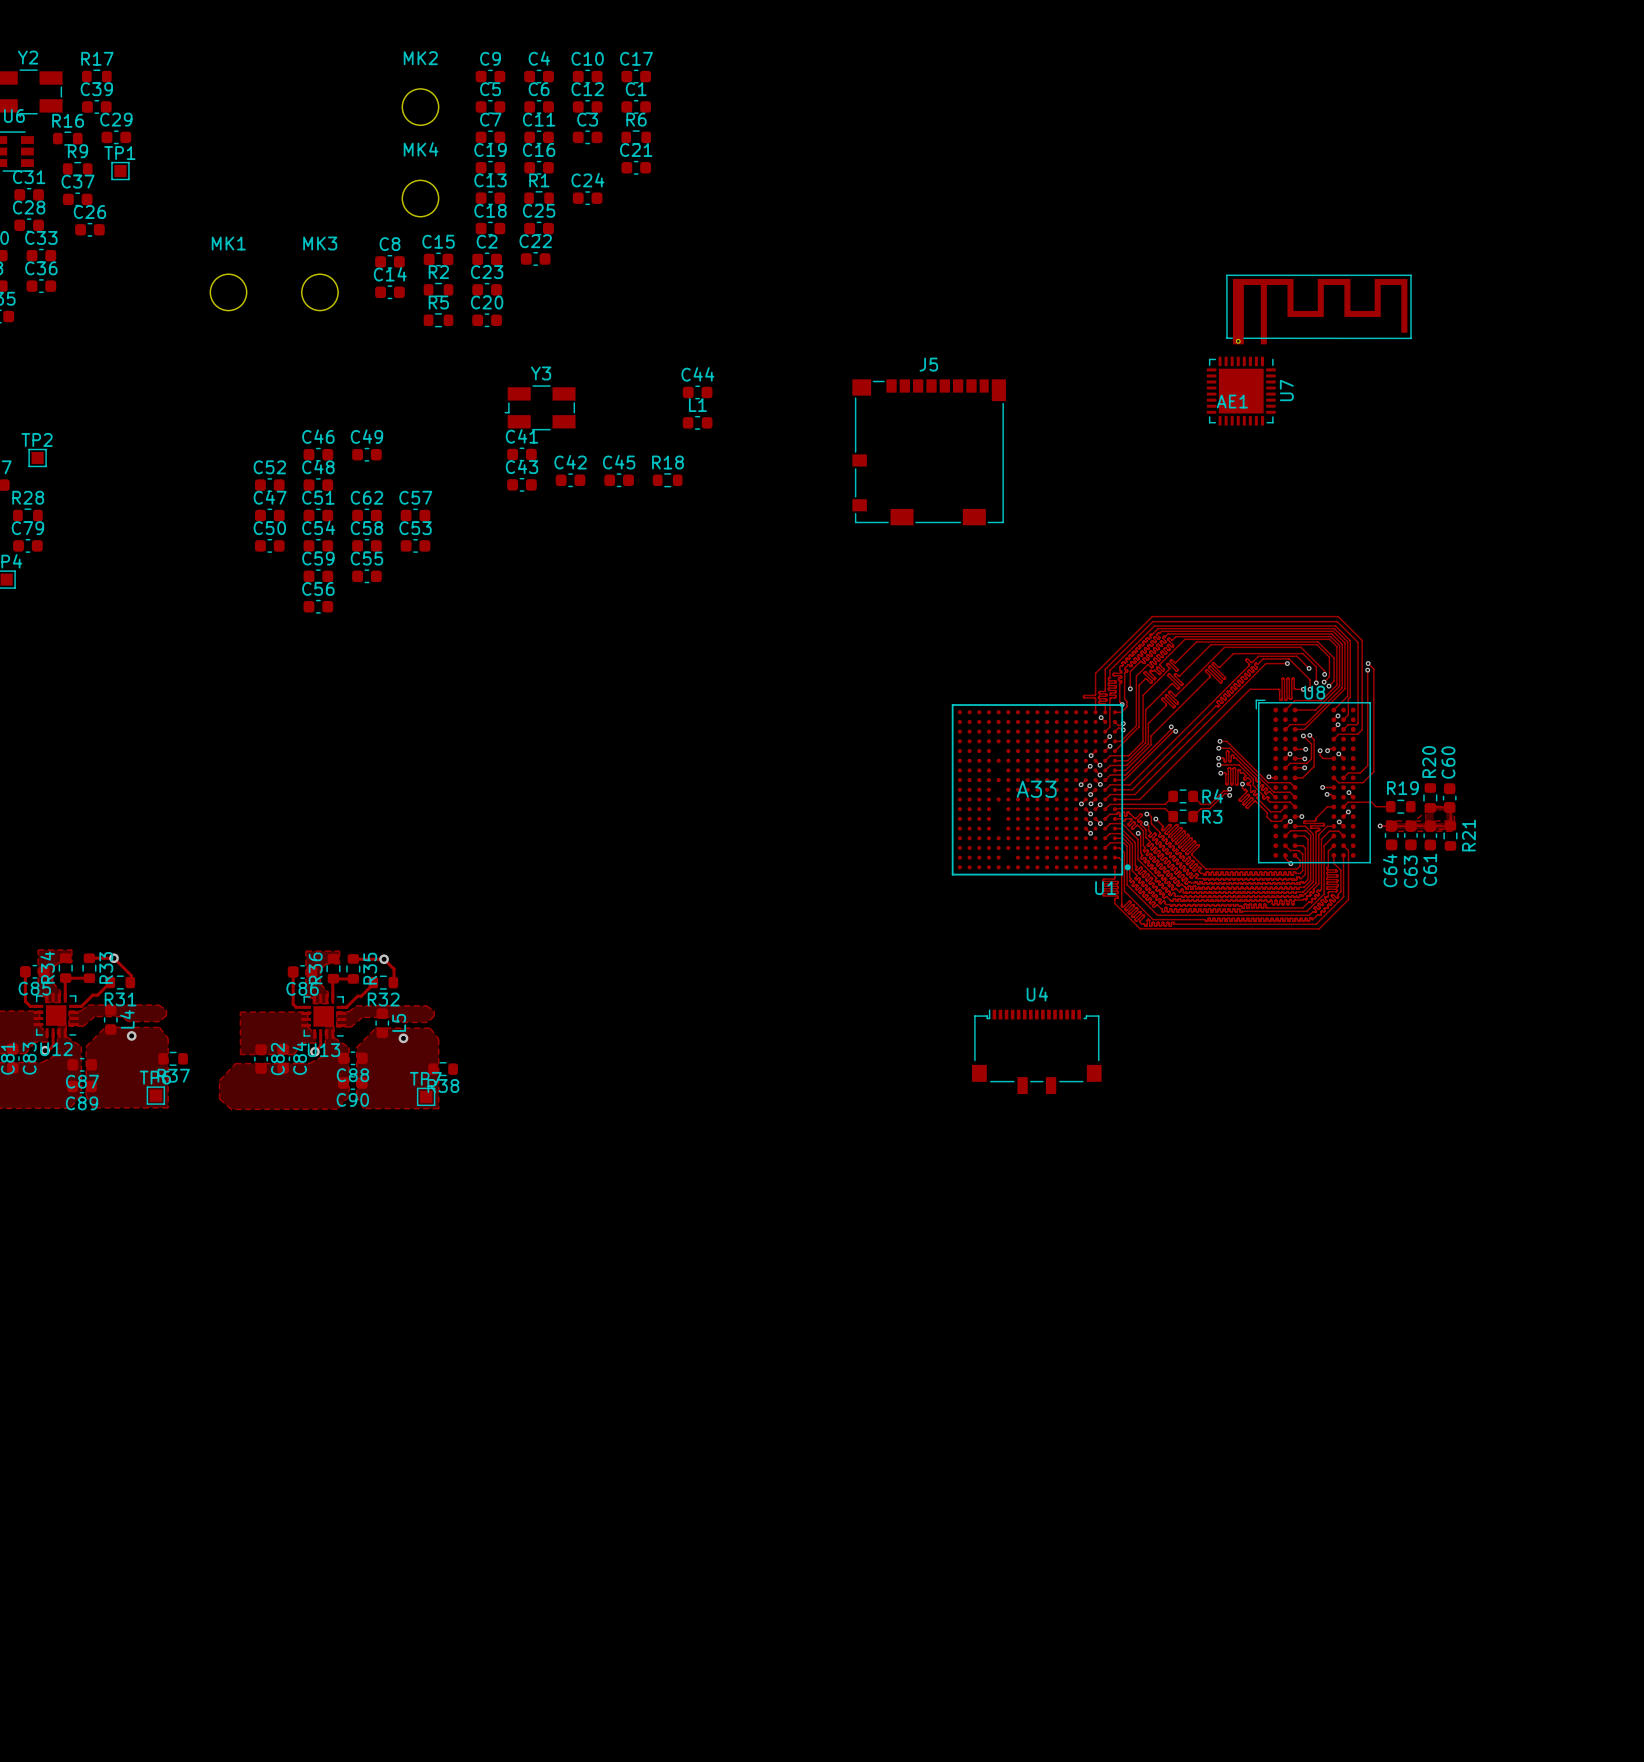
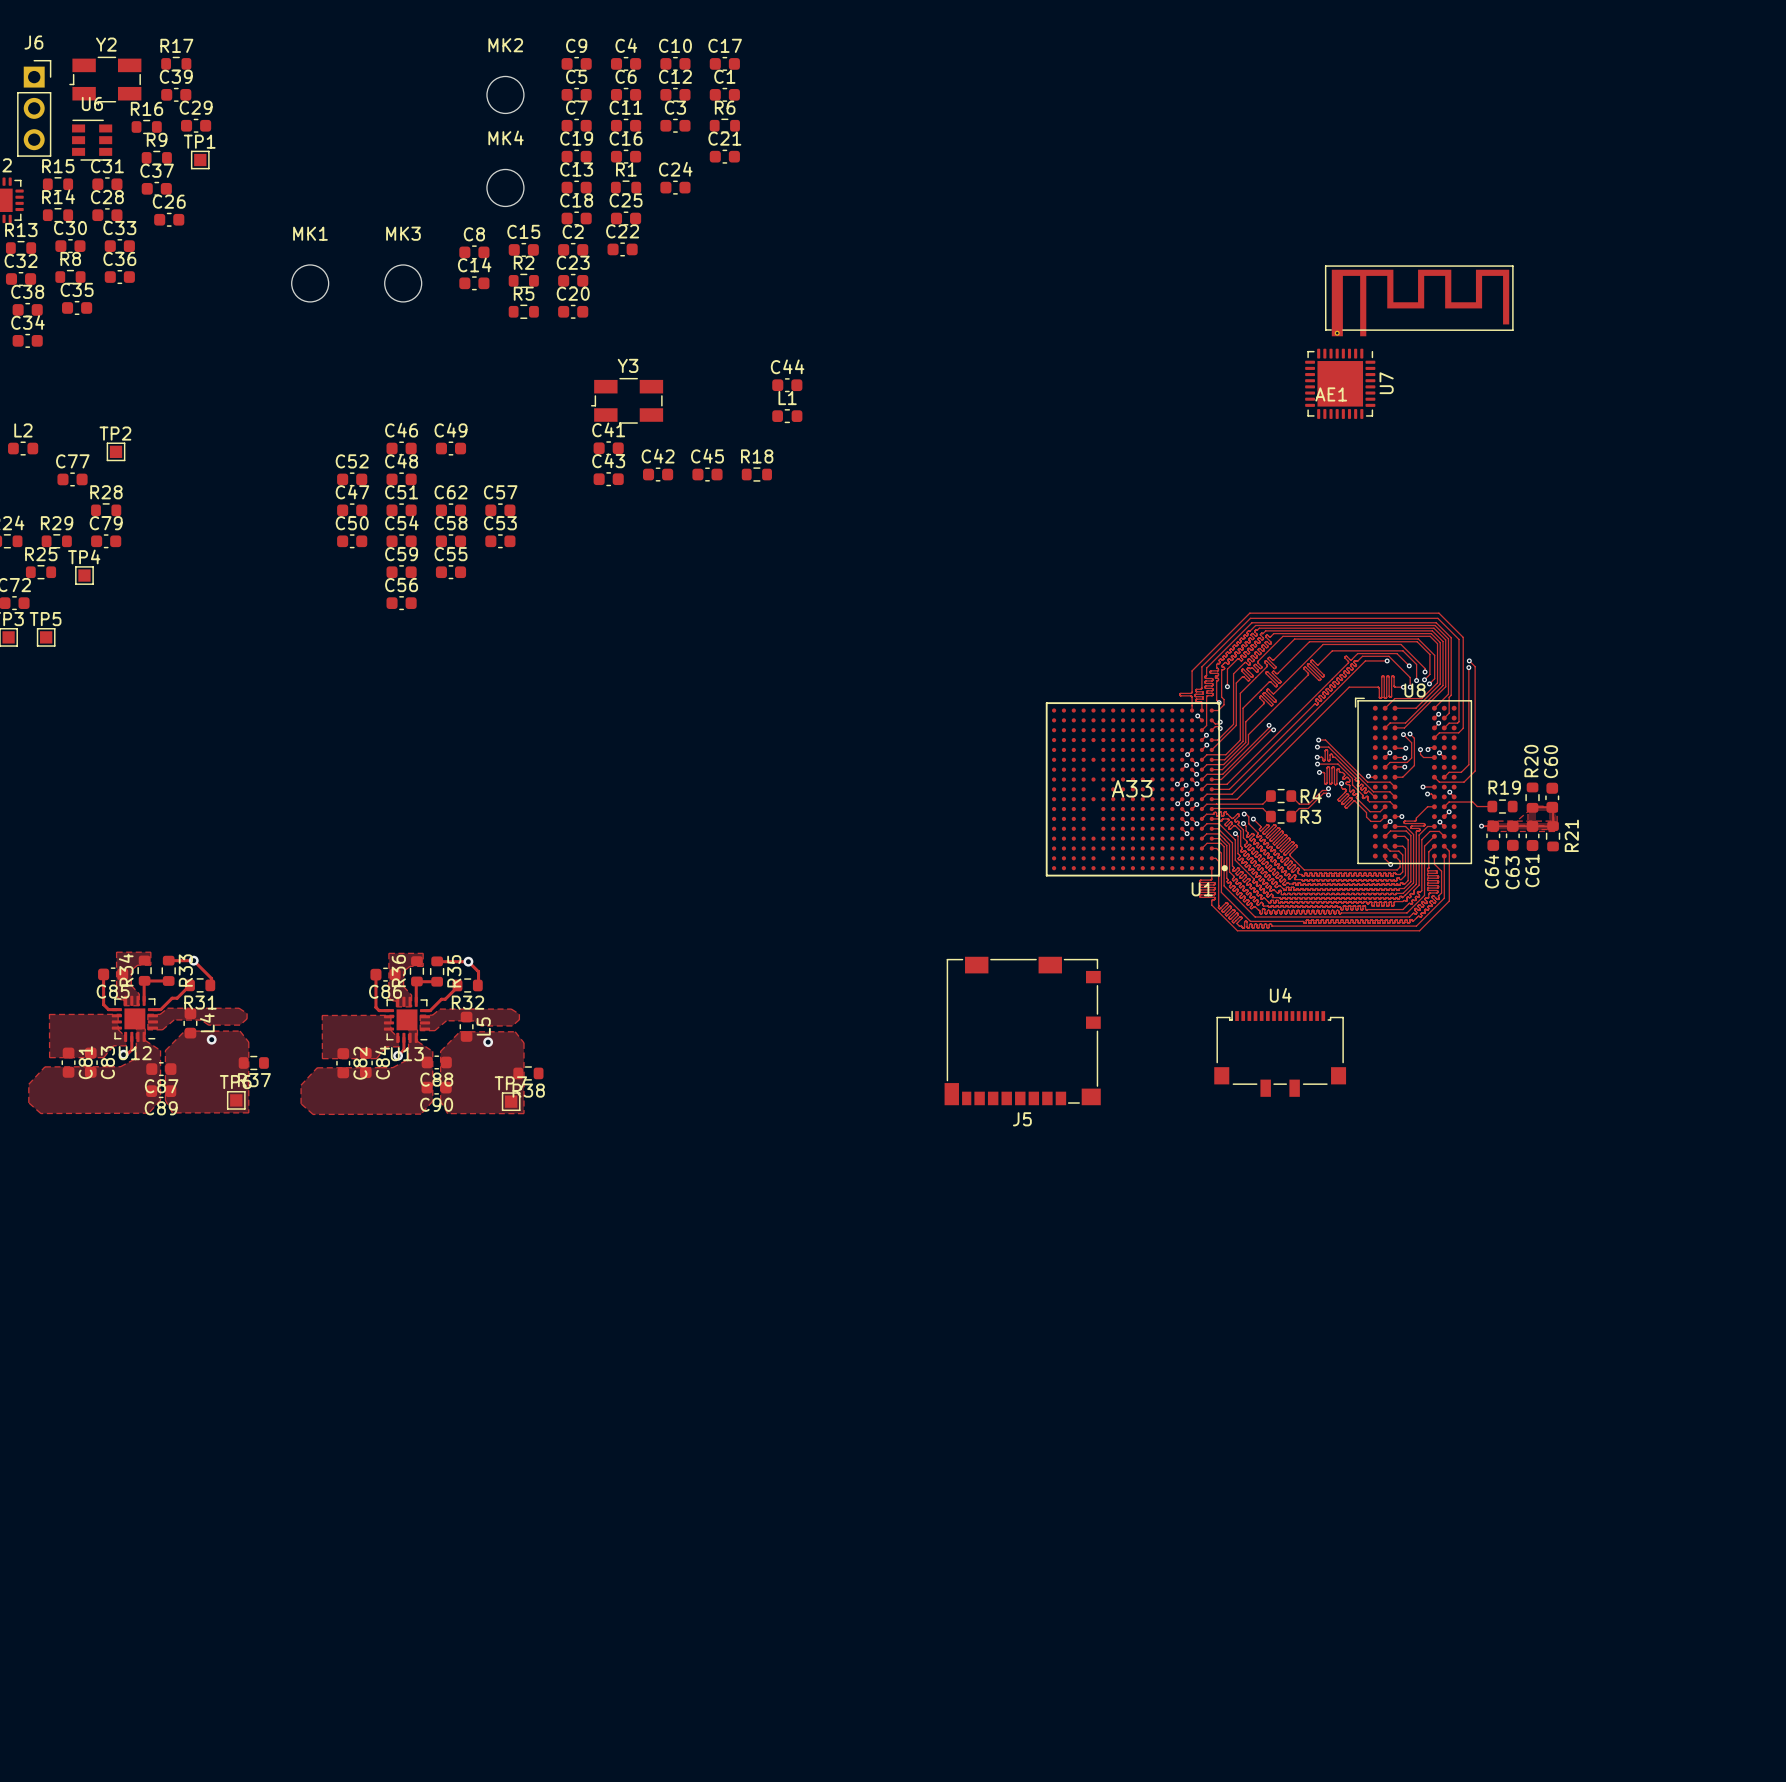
J5 rotation: 0° (929, 452) -> 180° (1022, 1031)
J5 position: (929, 452) -> (1022, 1031)
U4 position: (1036, 1051) -> (1280, 1053)

